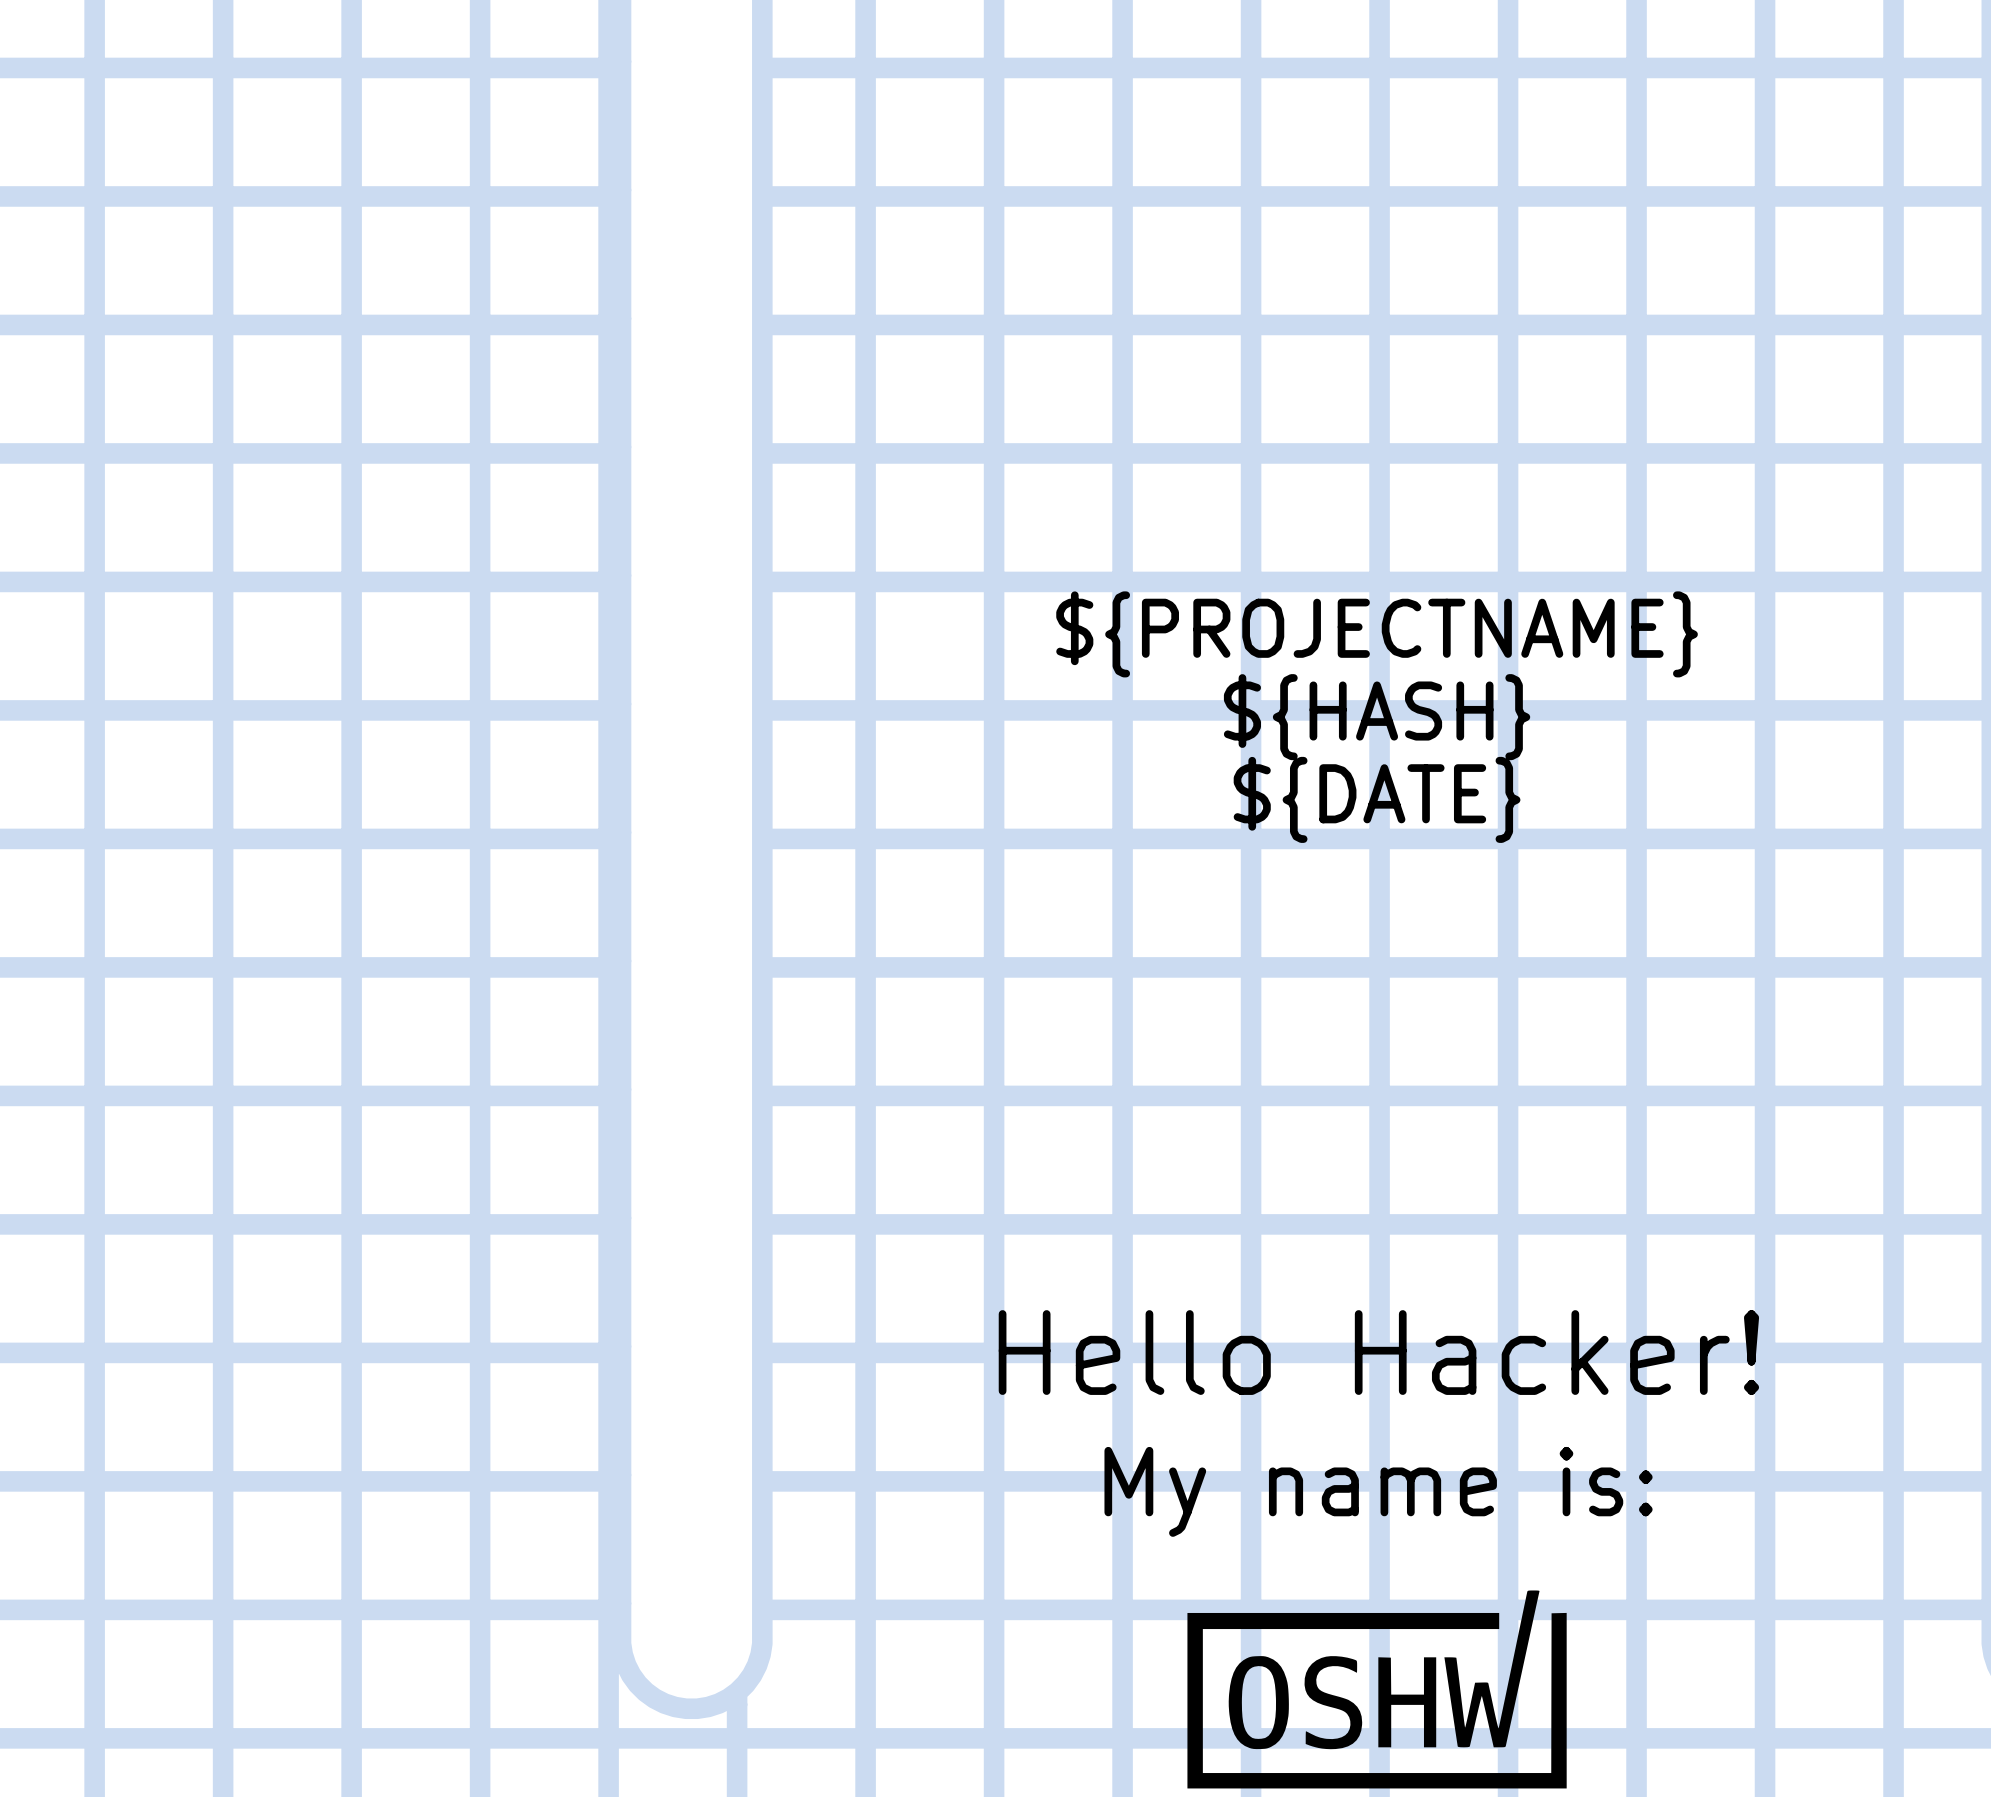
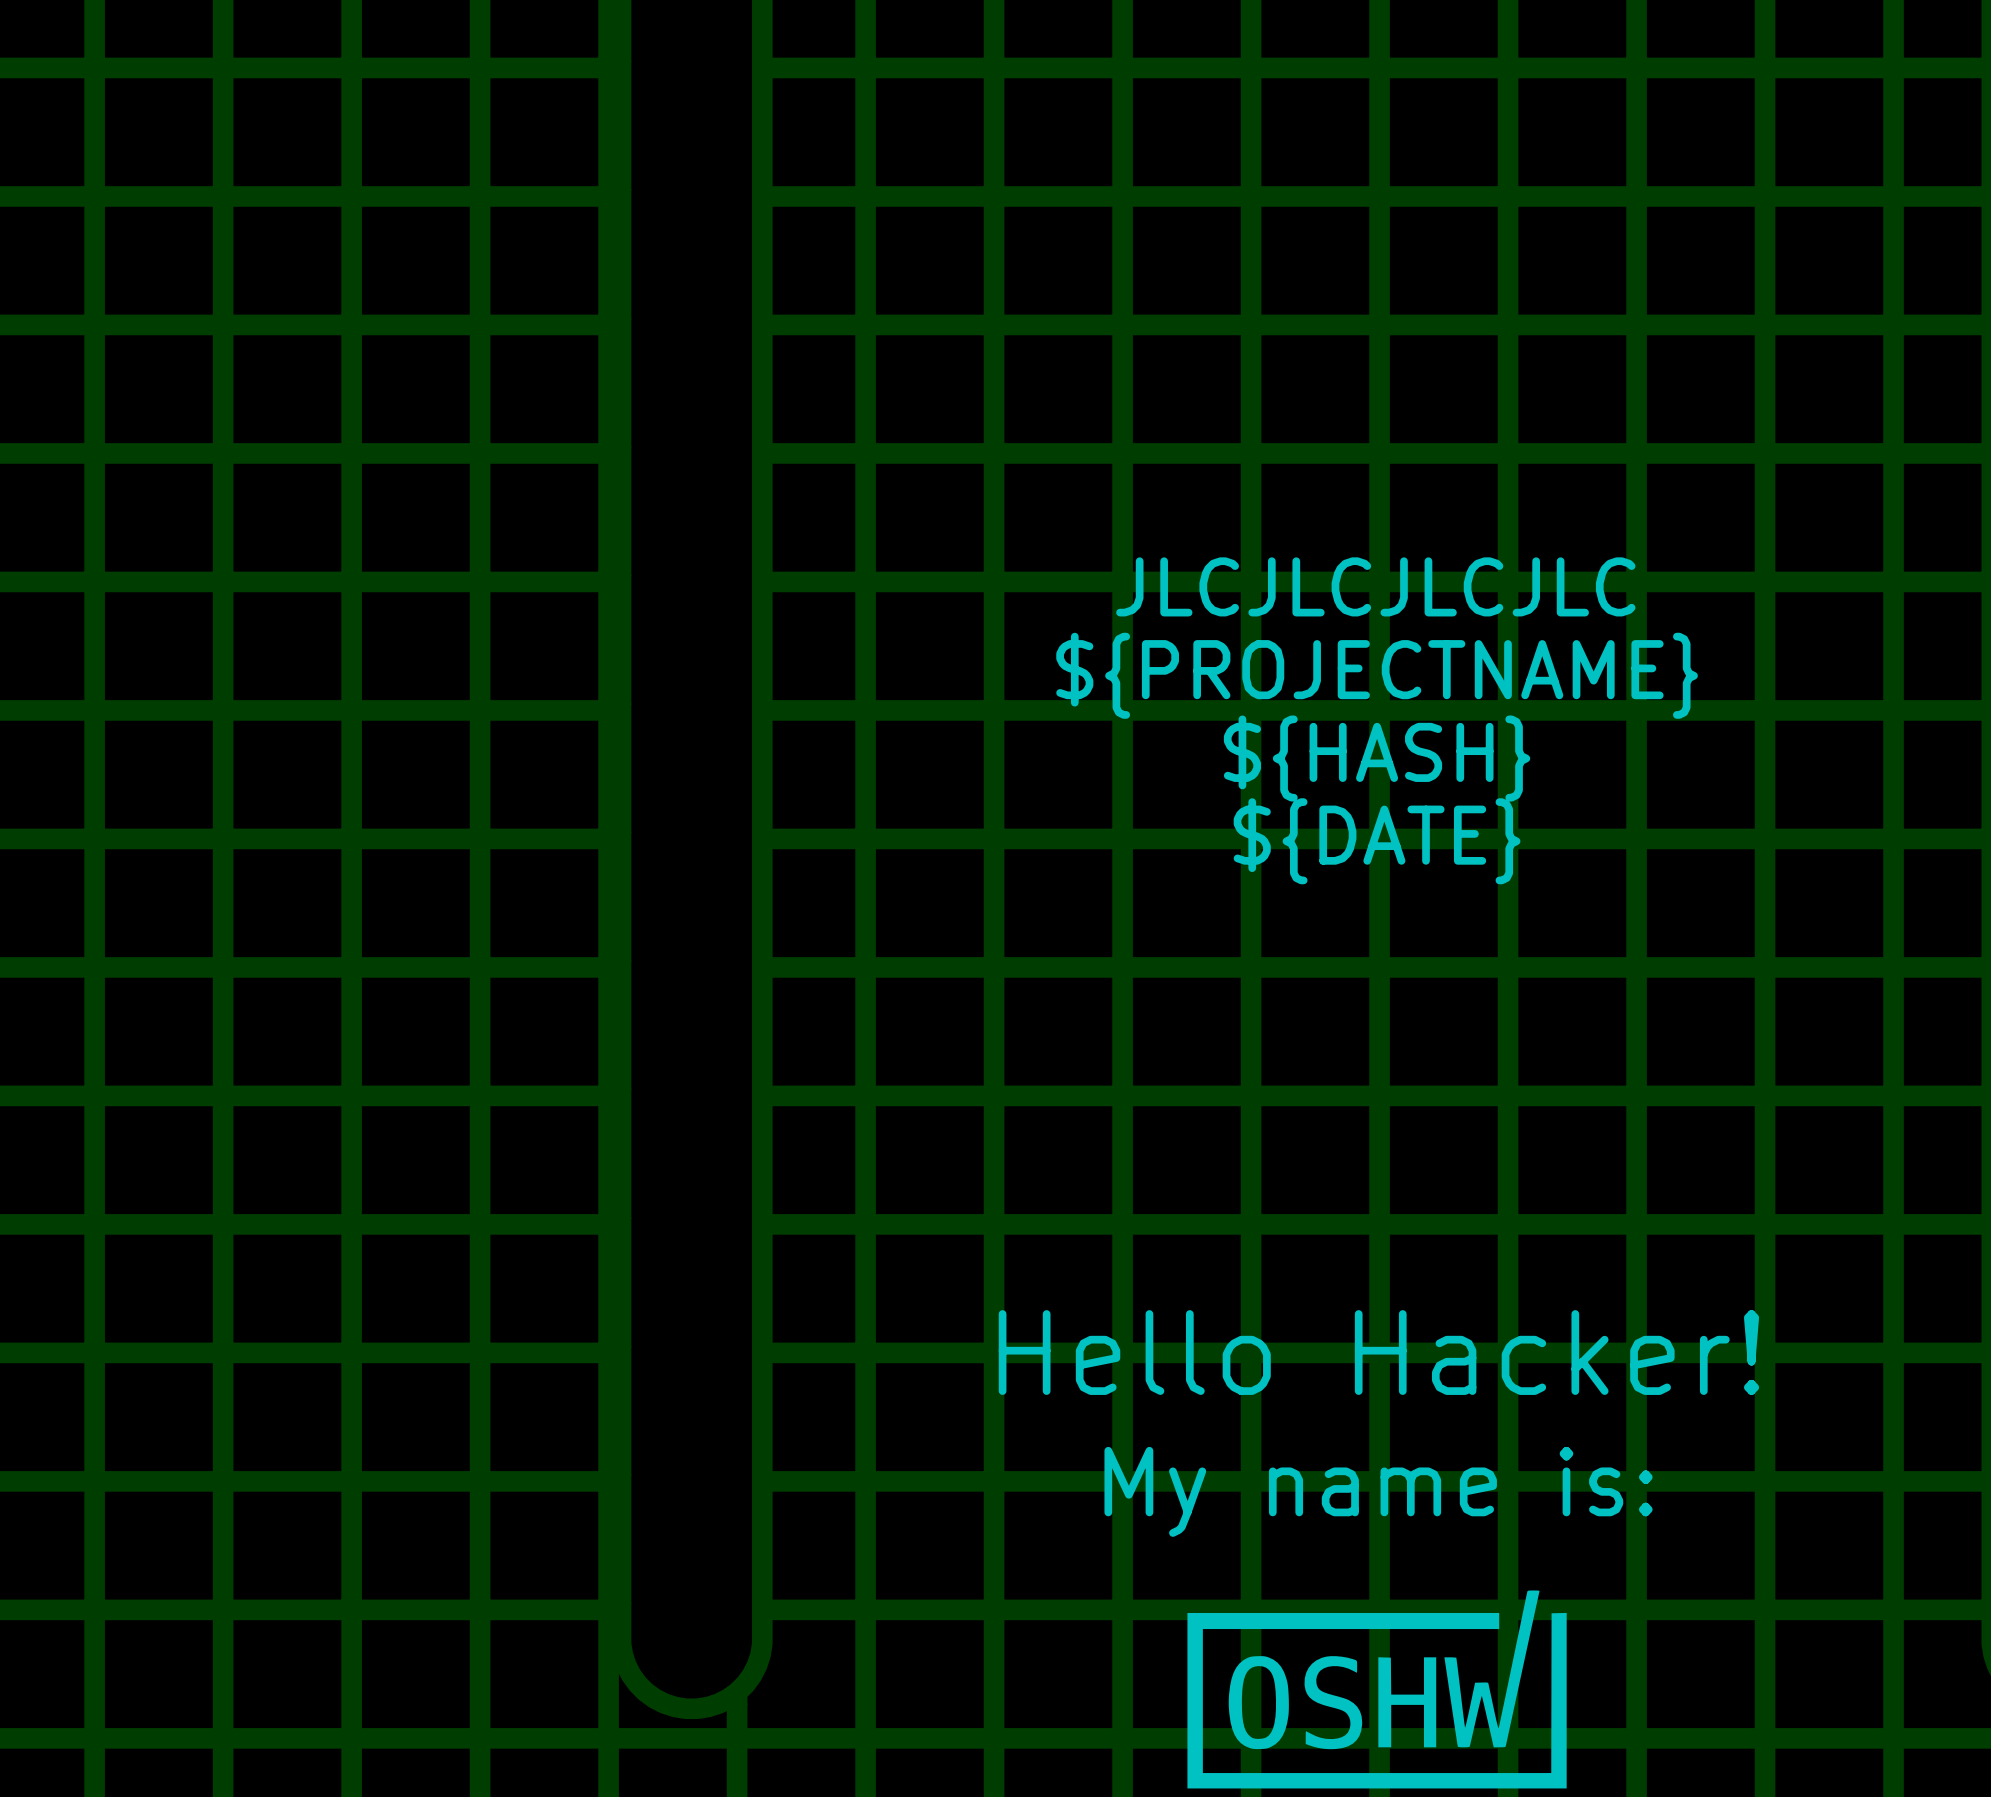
text: none -> JLCJLCJLCJLC (1375, 586)
text position: ${PROJECTNAME} (1377, 634) -> ${PROJECTNAME} (1377, 675)
text position: ${HASH} (1377, 717) -> ${HASH} (1377, 758)
text position: ${DATE} (1377, 799) -> ${DATE} (1377, 841)

